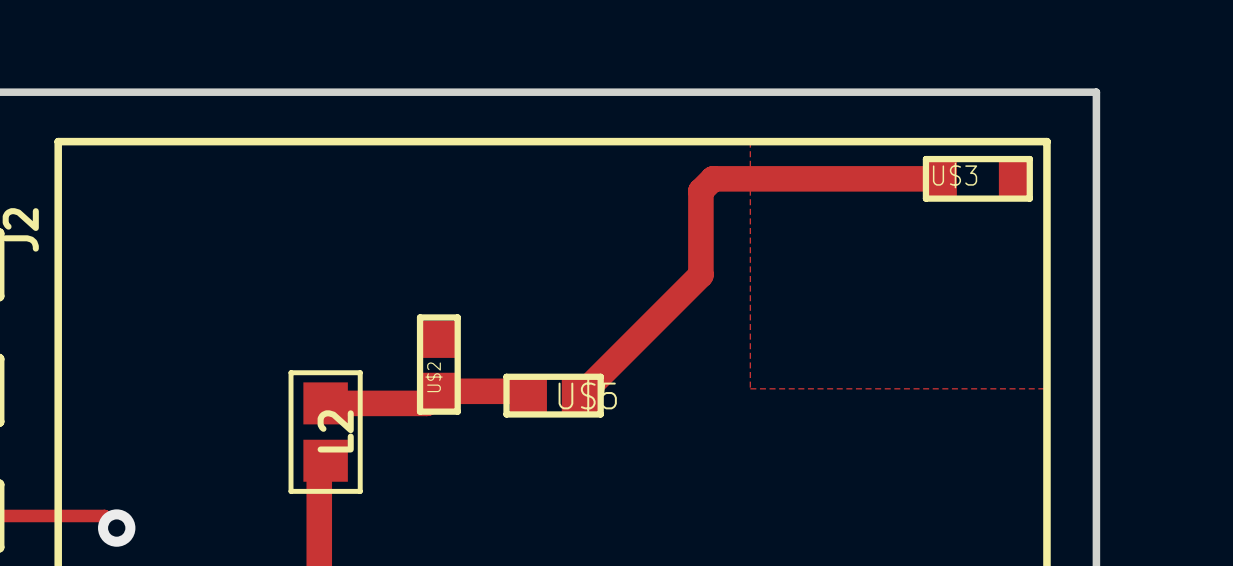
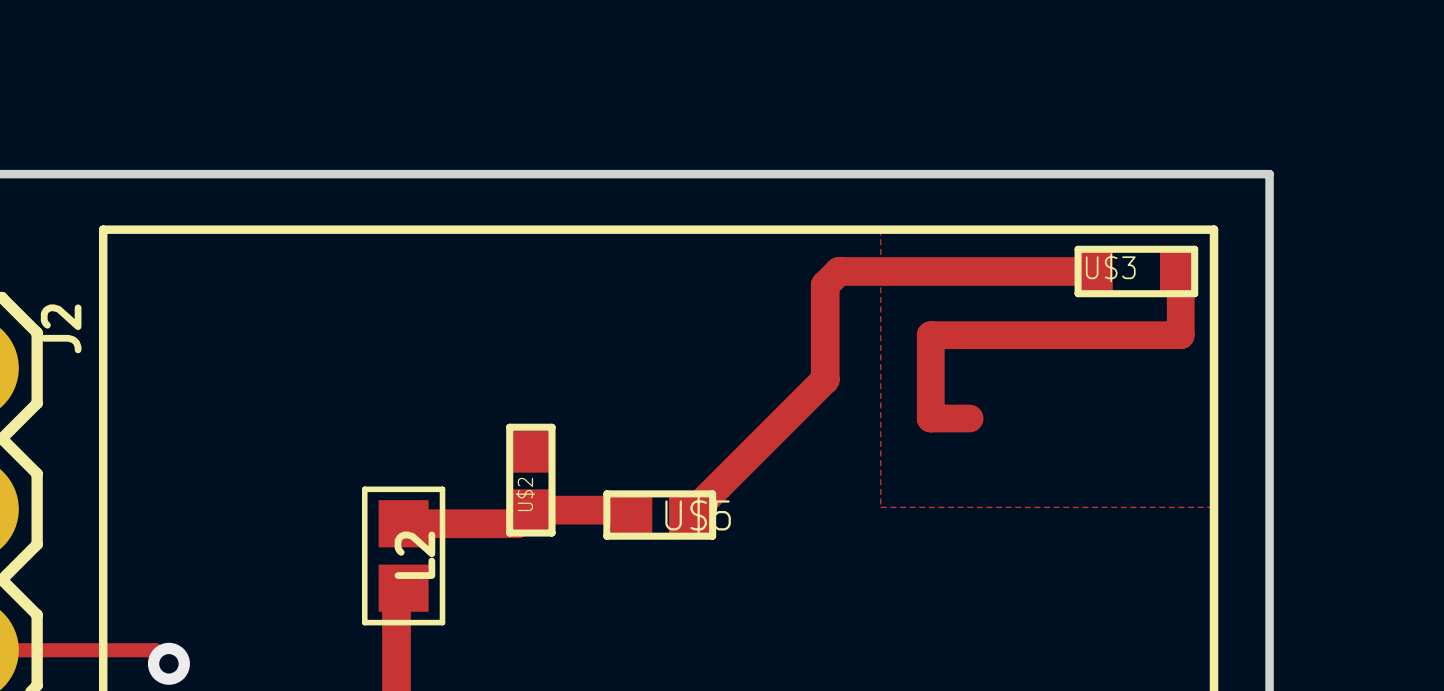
track: none -> (1180, 279) (1180, 335) (930, 335) (930, 418) (969, 418)

